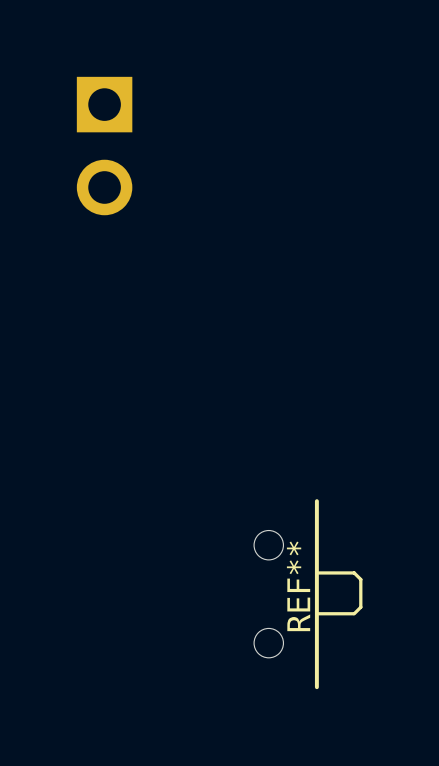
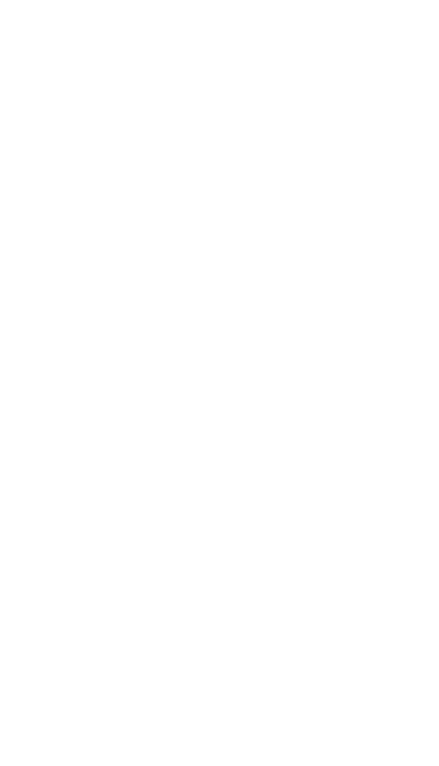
part: (104, 146) -> none
part: (308, 594) -> none

